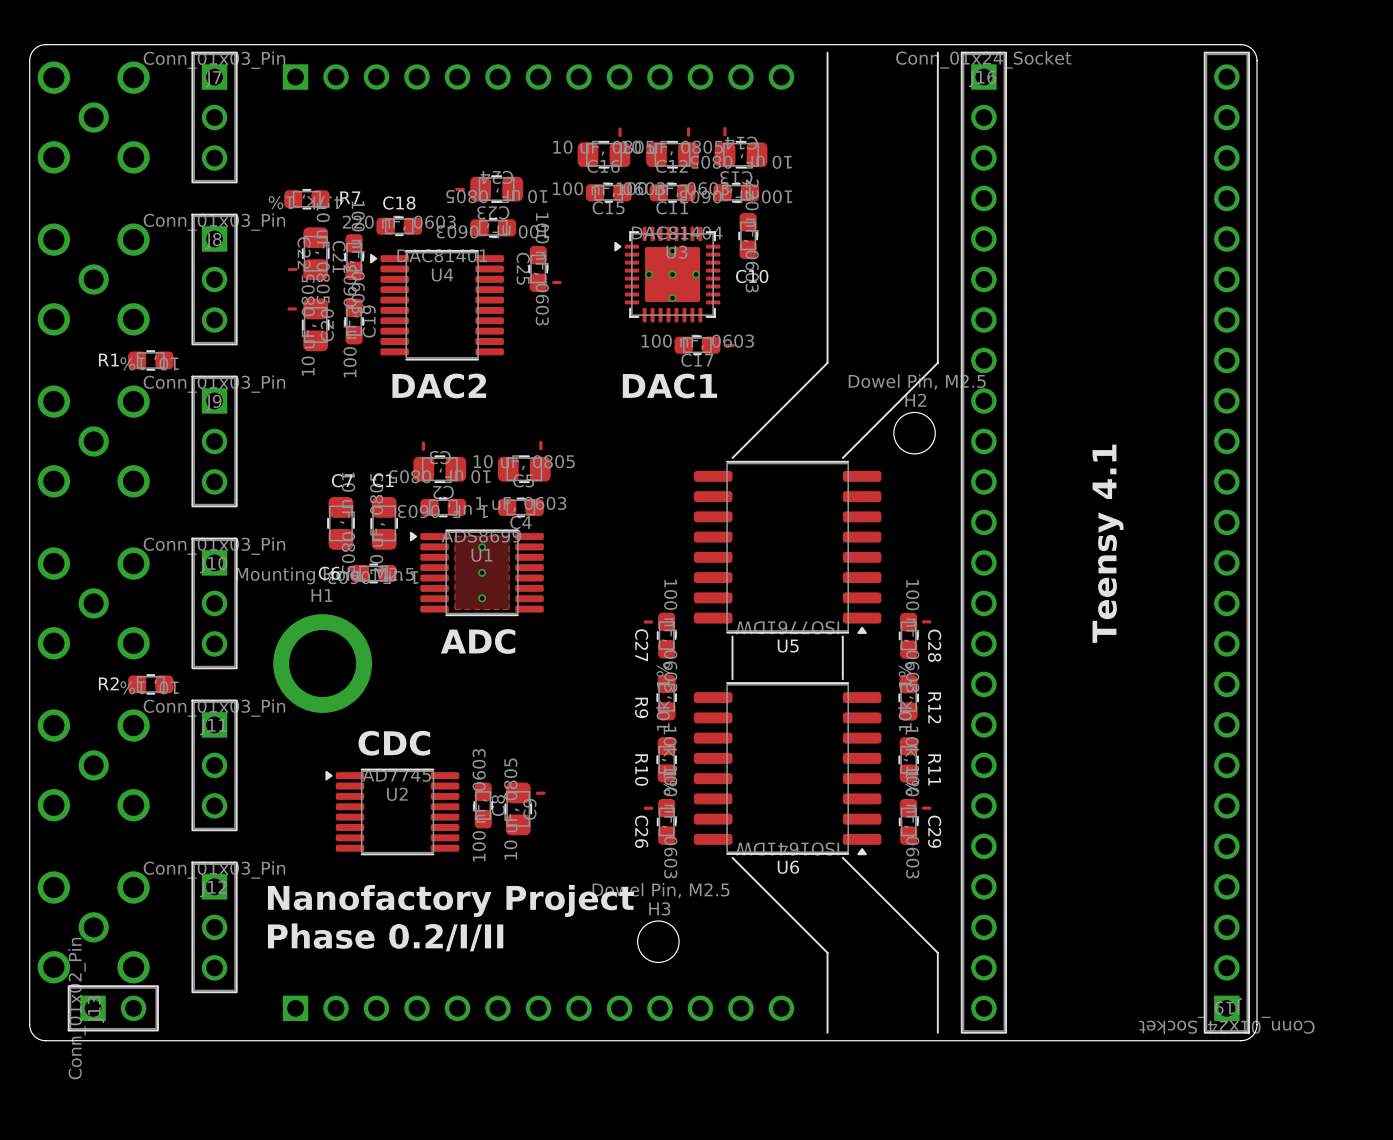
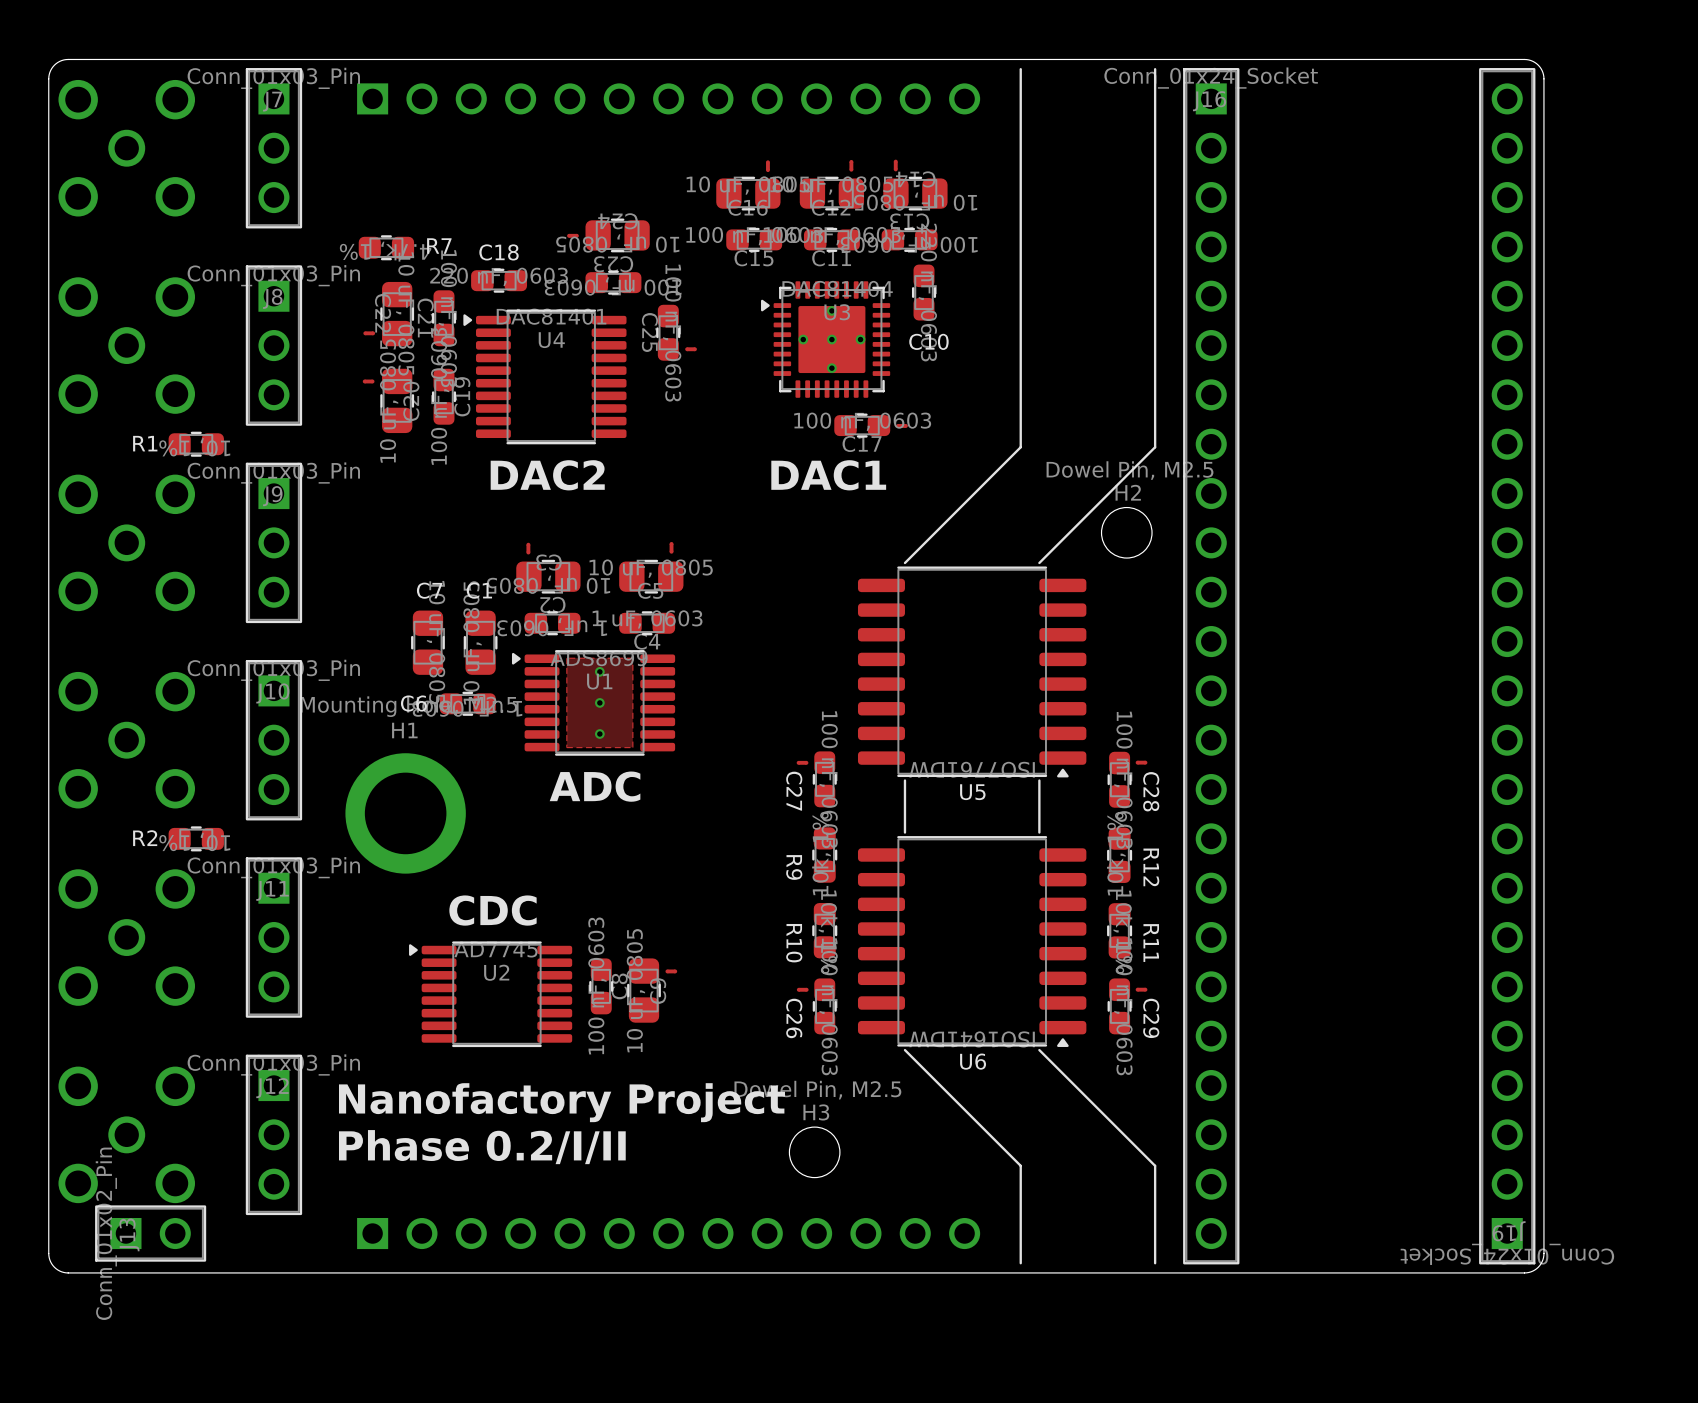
text: Teensy 4.1 (1108, 543) -> none

